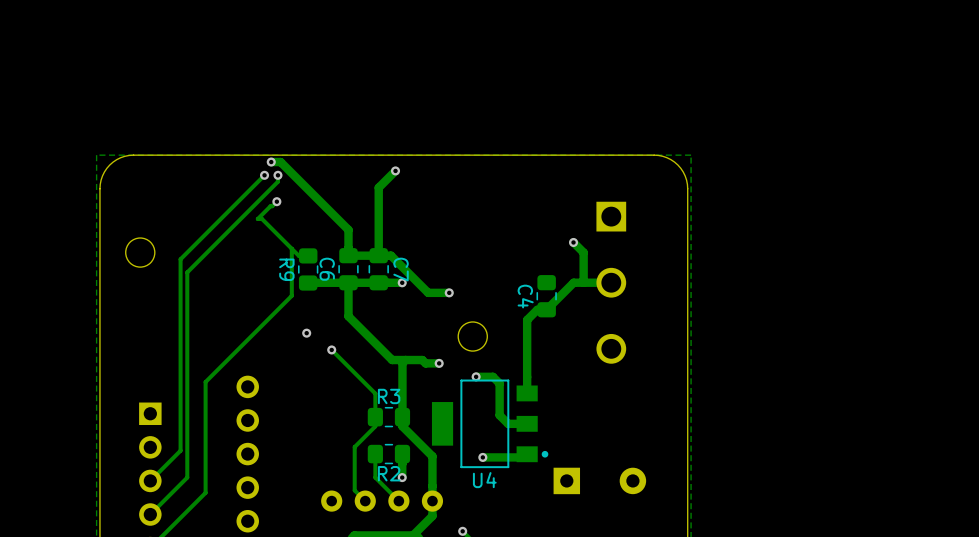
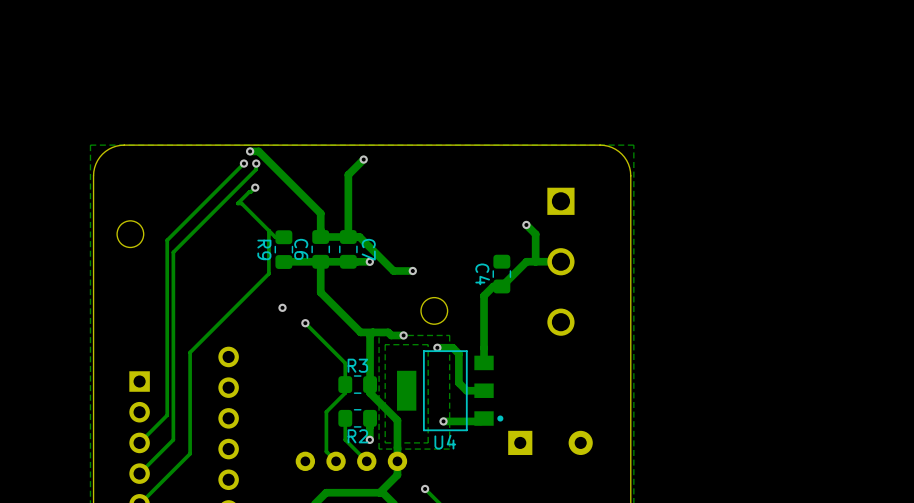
zone outline: none -> (449, 335) (379, 335) (379, 449) (449, 449) (449, 335)
zone outline: none -> (428, 344) (428, 442) (385, 442) (385, 344) (428, 344)

